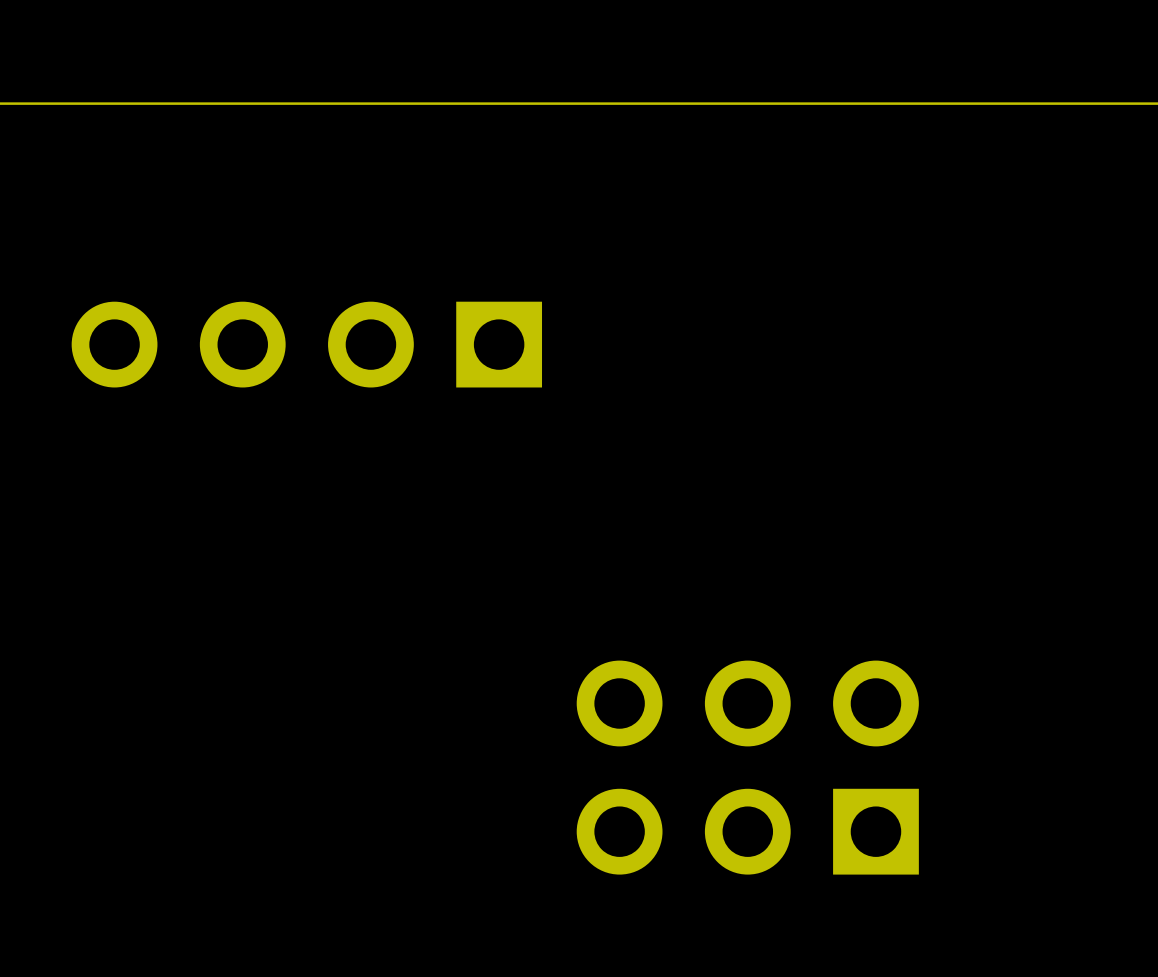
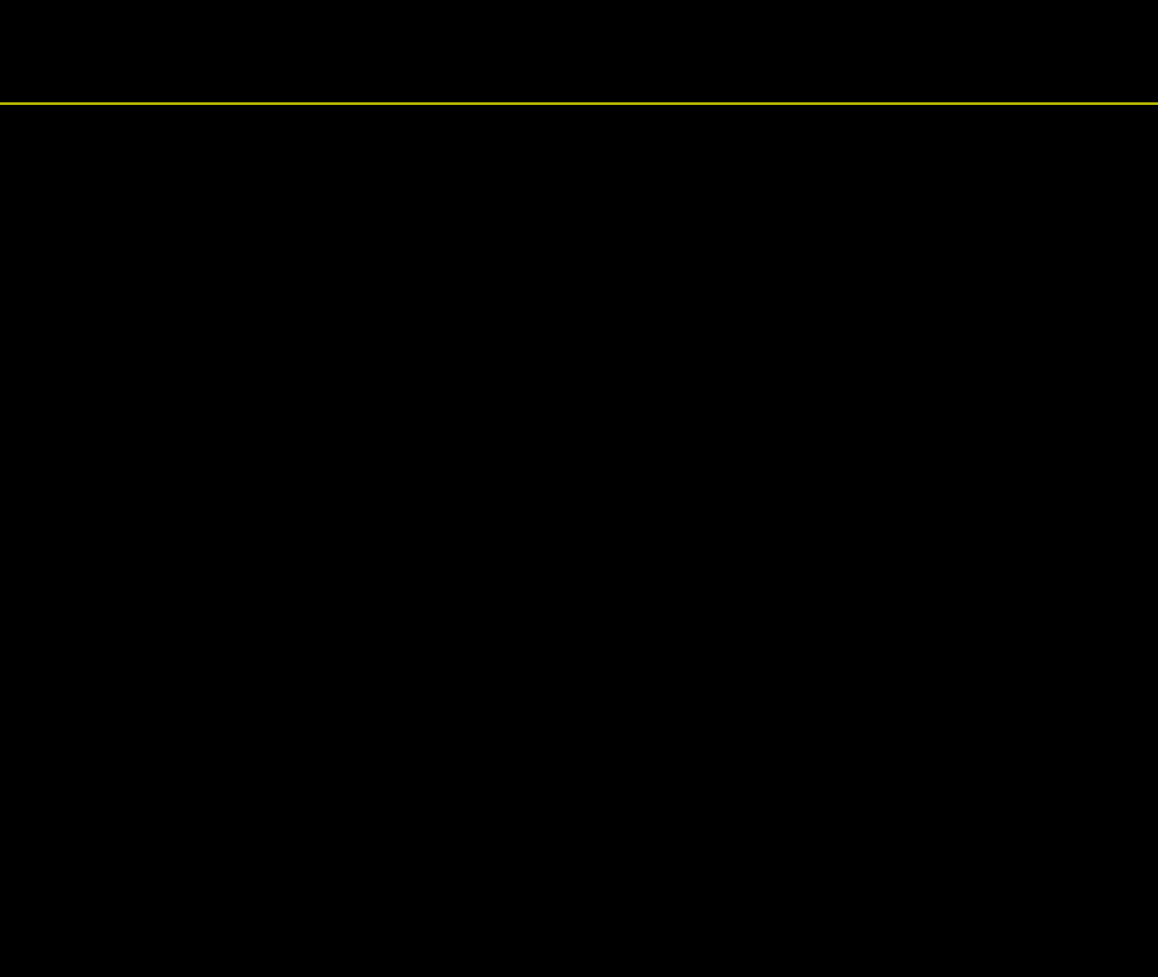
part: (306, 344) -> none
part: (747, 767) -> none

